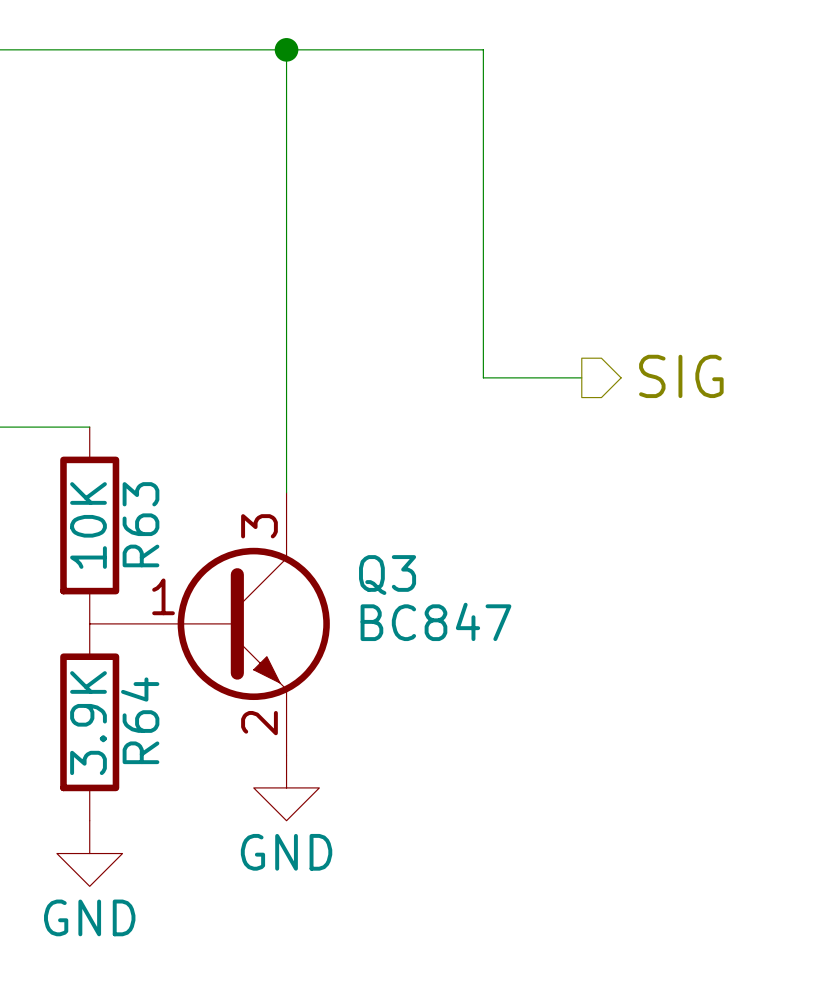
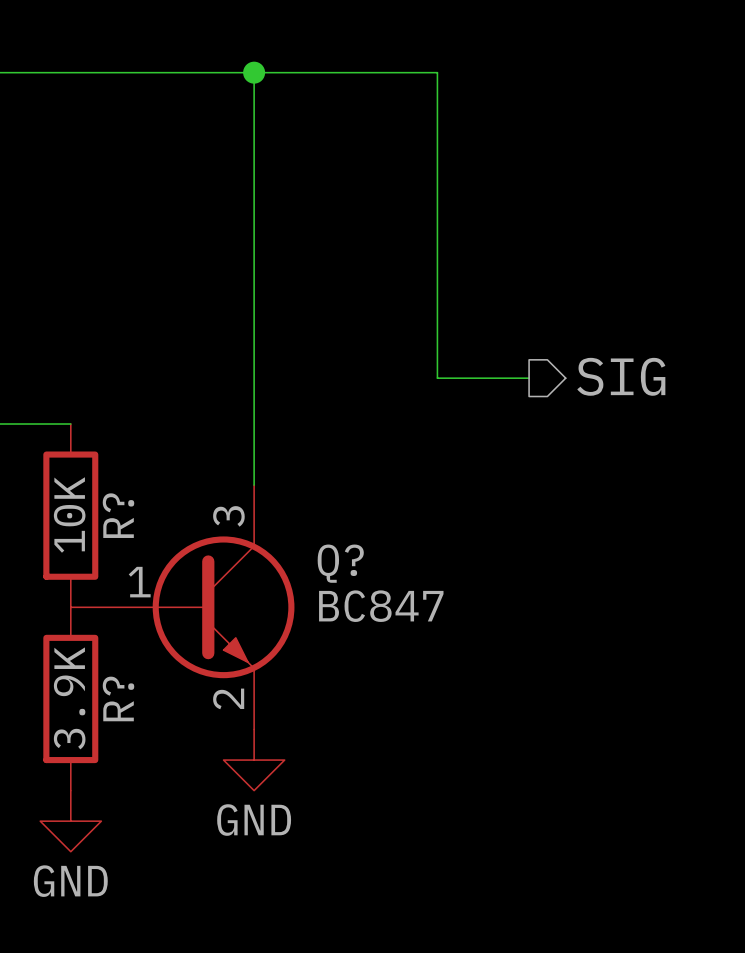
R63 name: R63 (140, 524) -> R? (118, 515)
Q3 name: Q3 (387, 575) -> Q? (340, 563)
R64 name: R64 (140, 720) -> R? (118, 698)

